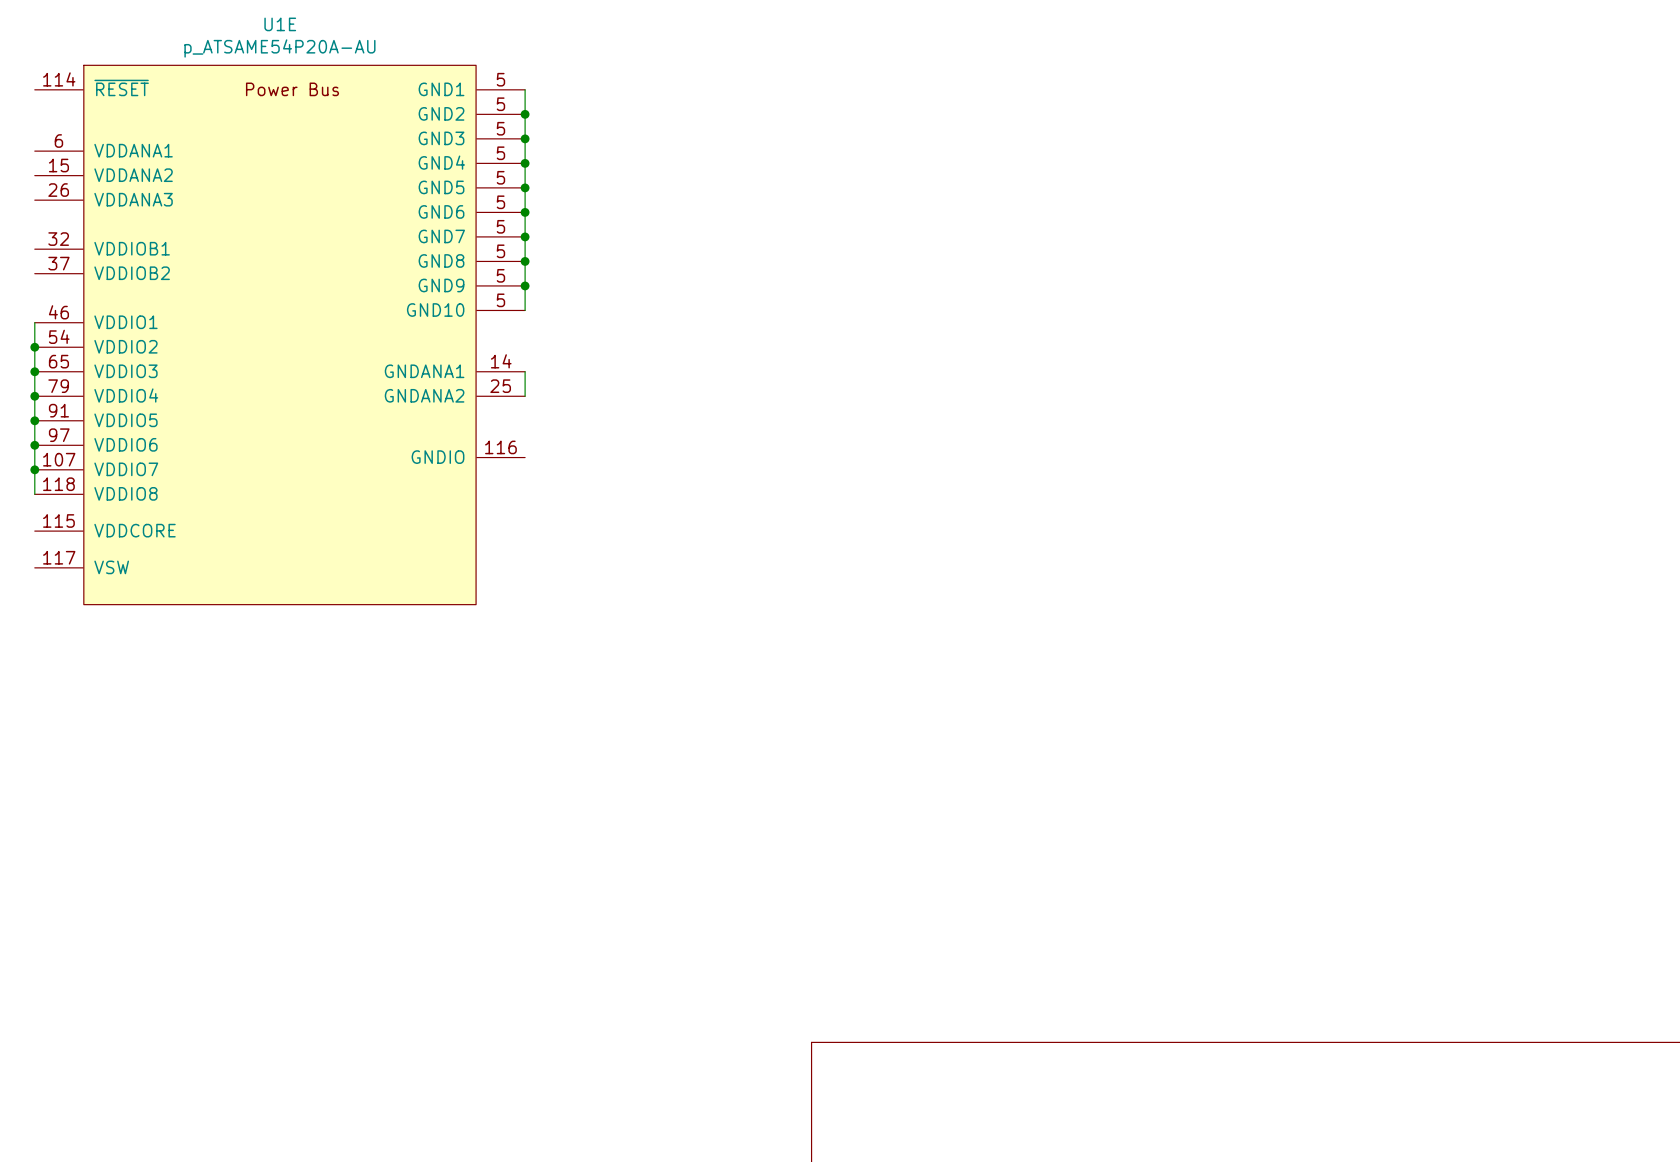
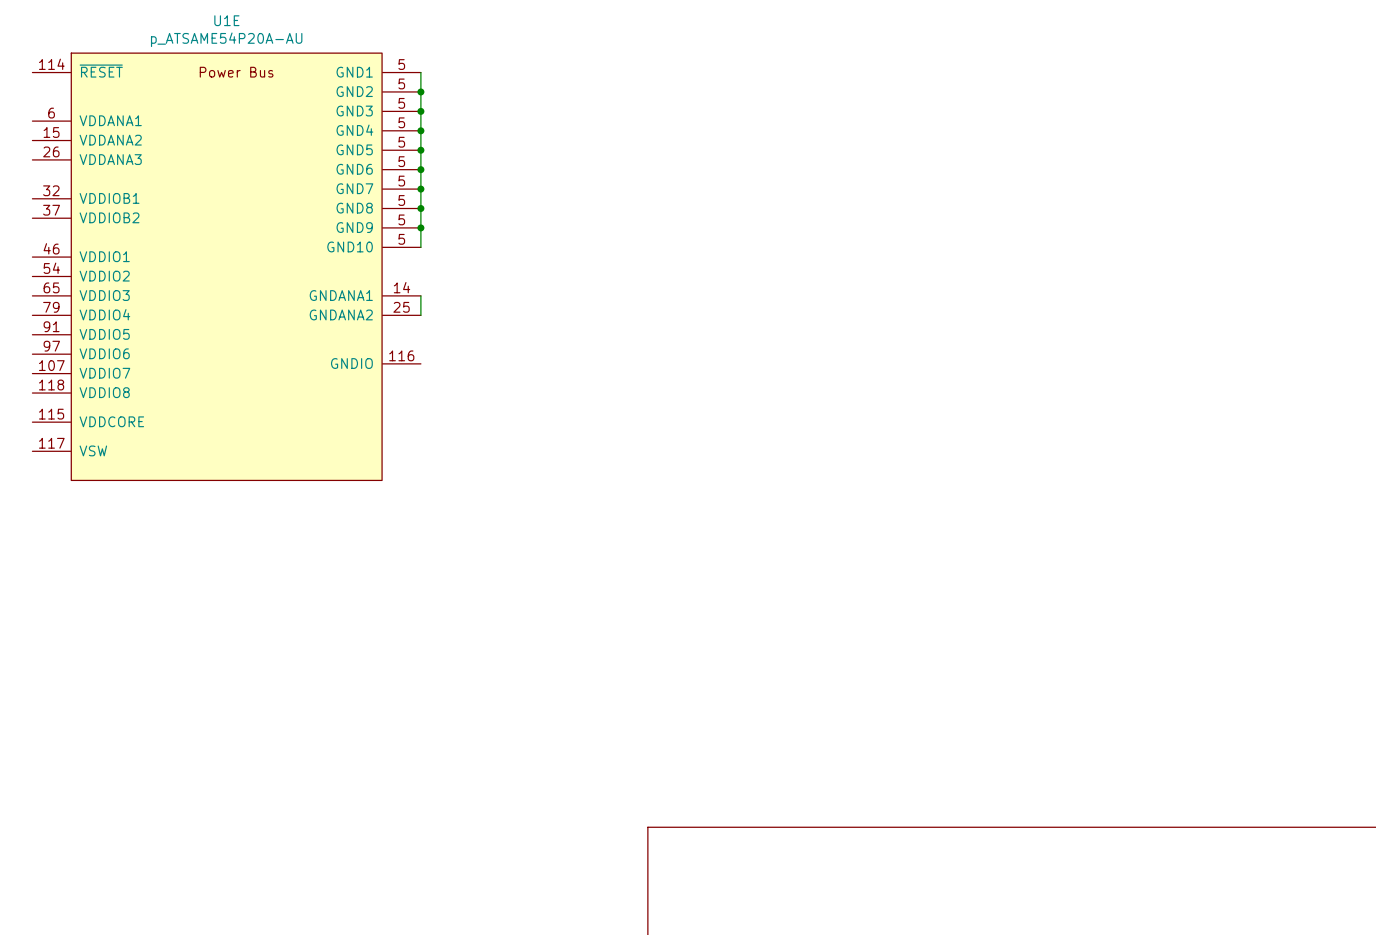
wire: (34, 322) (34, 494) -> none
junction: (34, 347) -> none
junction: (34, 371) -> none
junction: (34, 396) -> none
junction: (34, 420) -> none
junction: (34, 445) -> none
junction: (34, 469) -> none

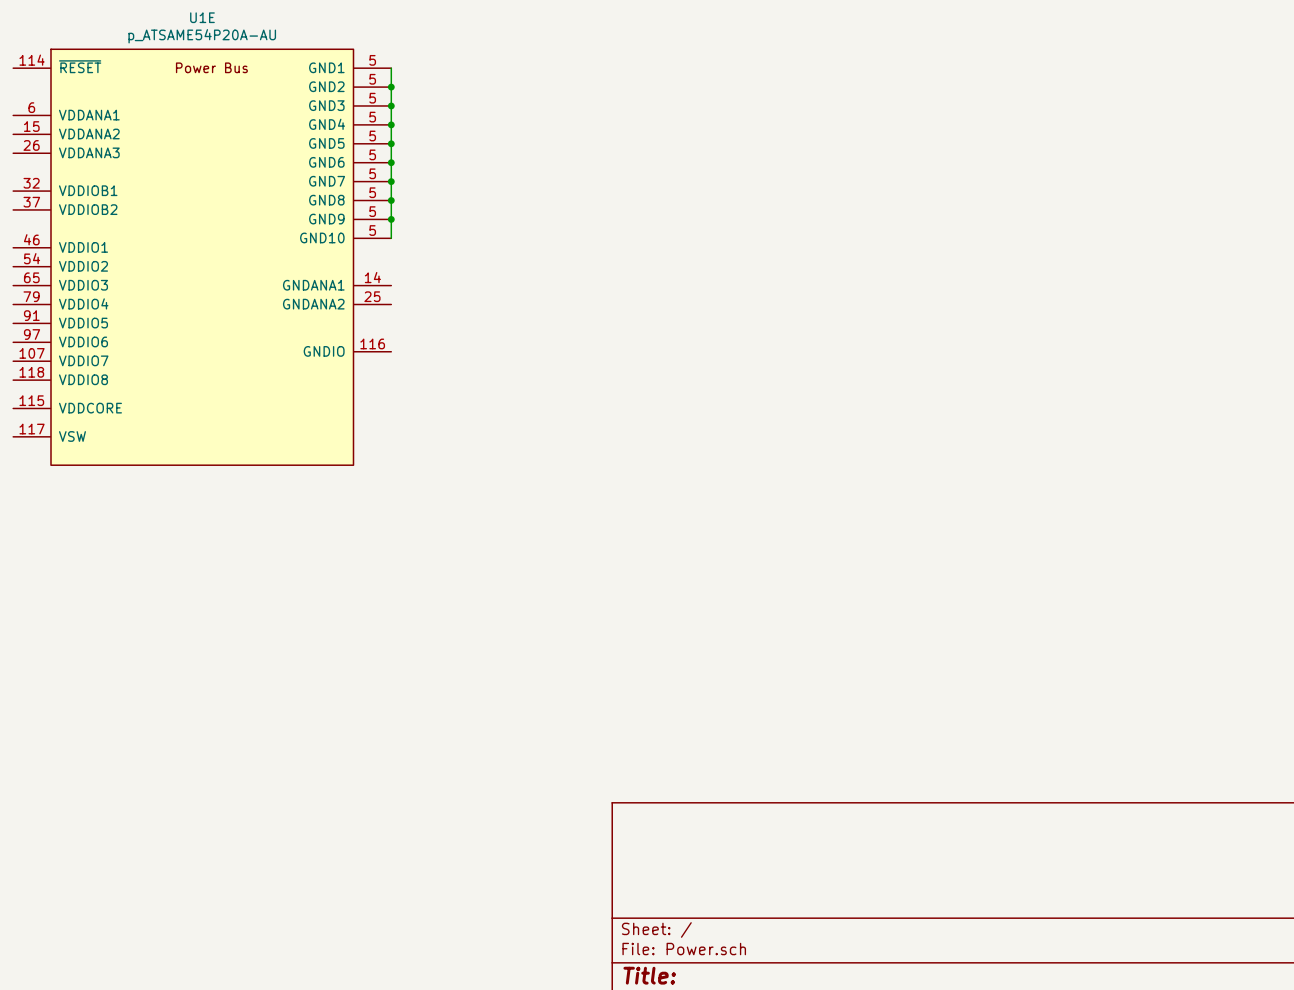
wire: (420, 295) (420, 315) -> none

